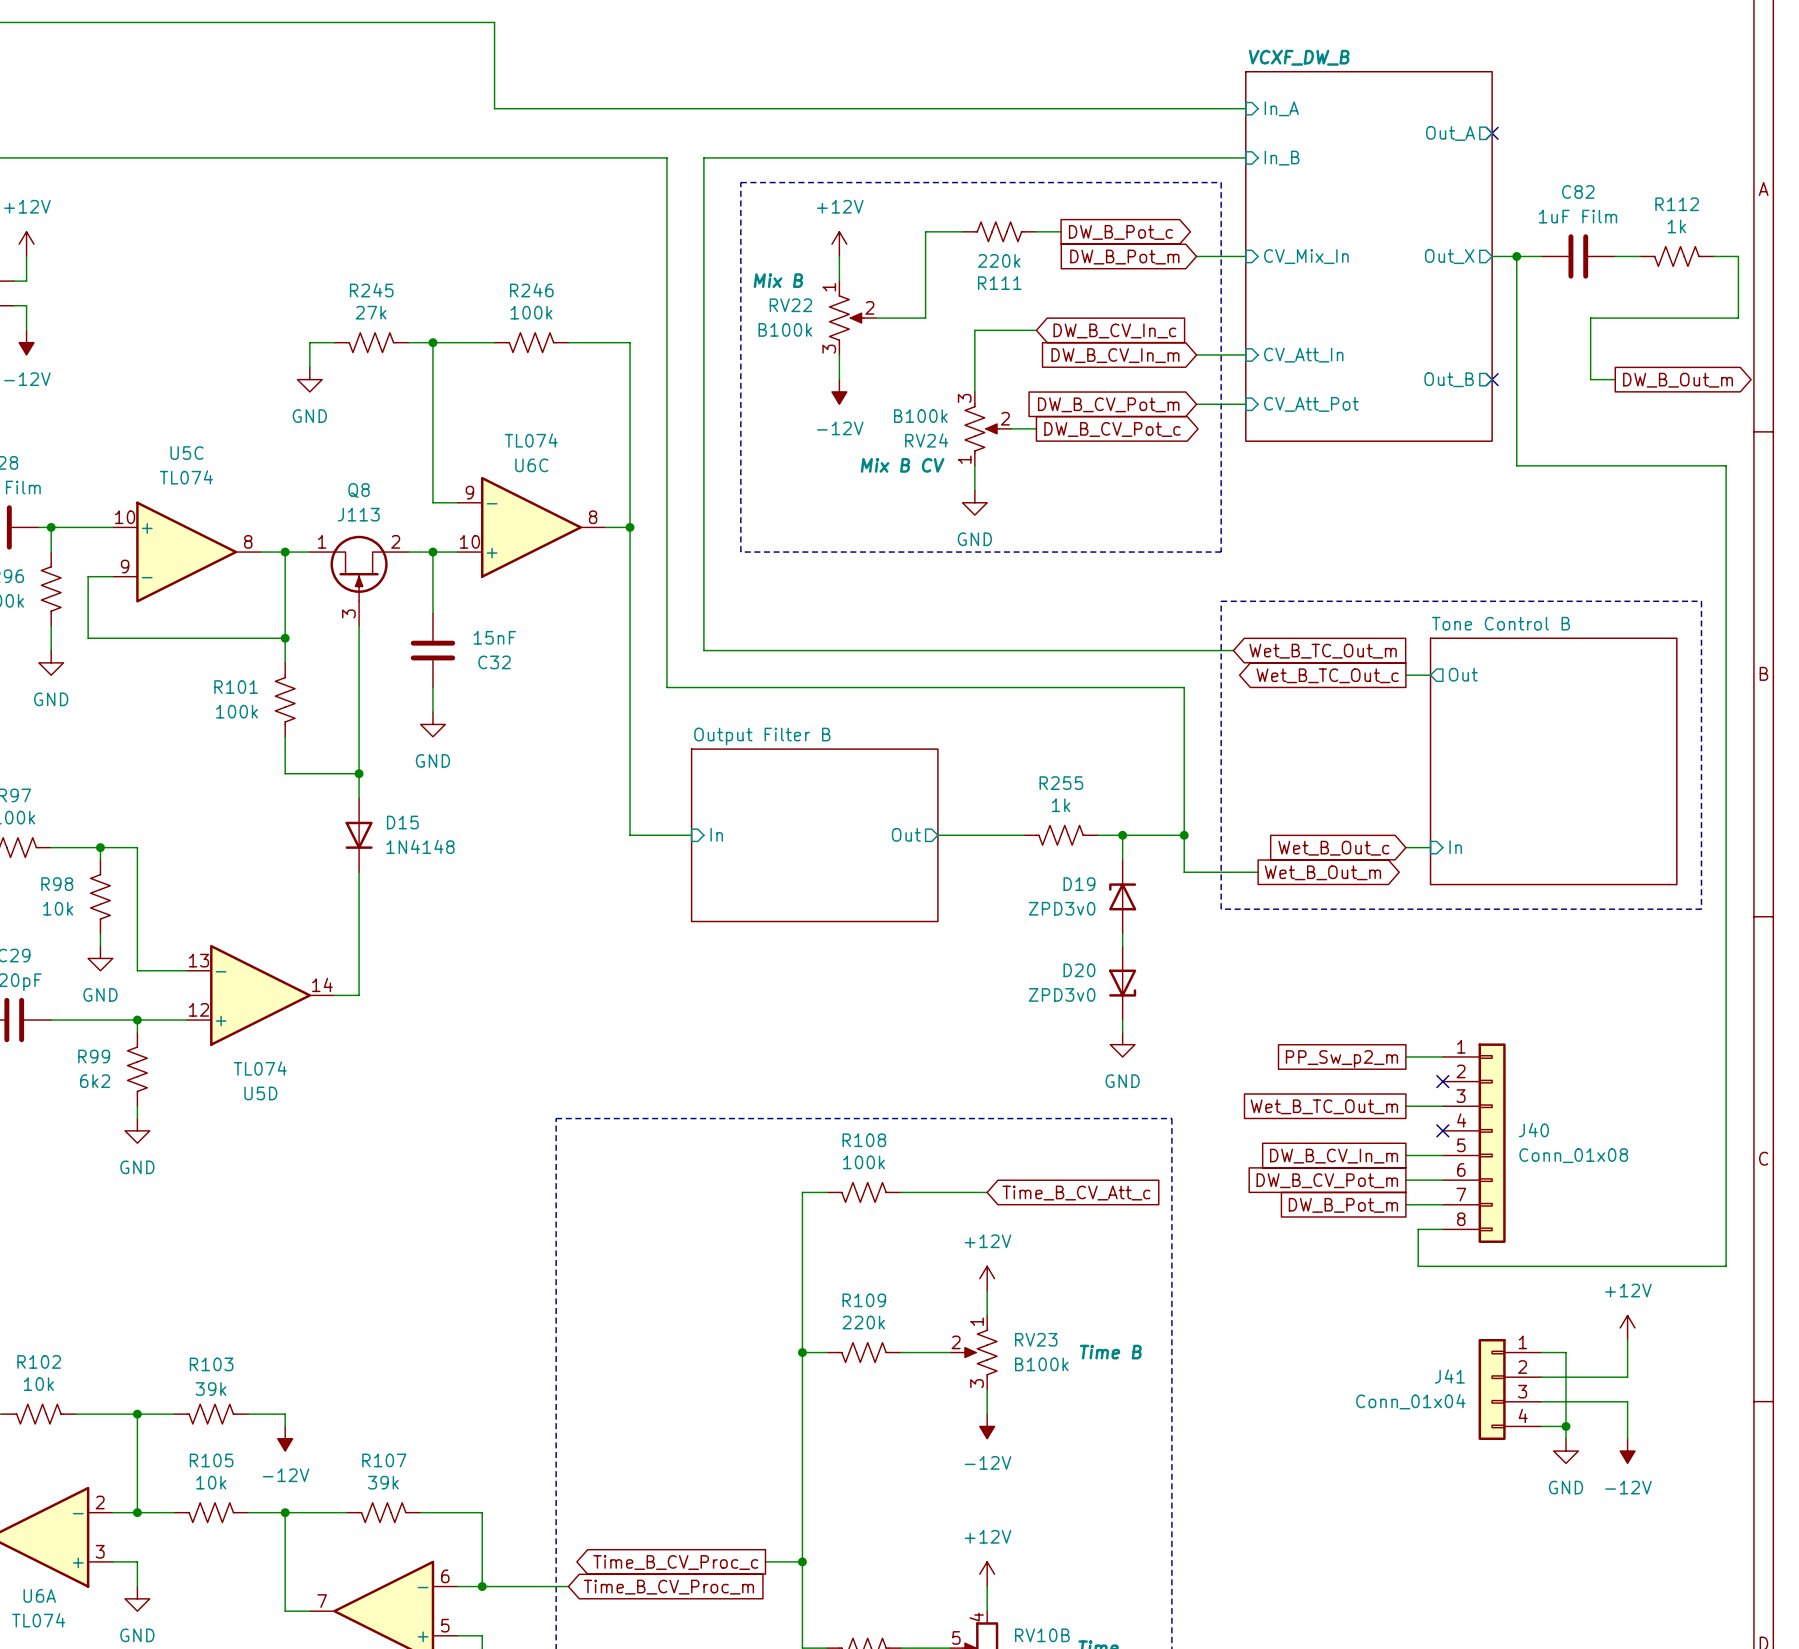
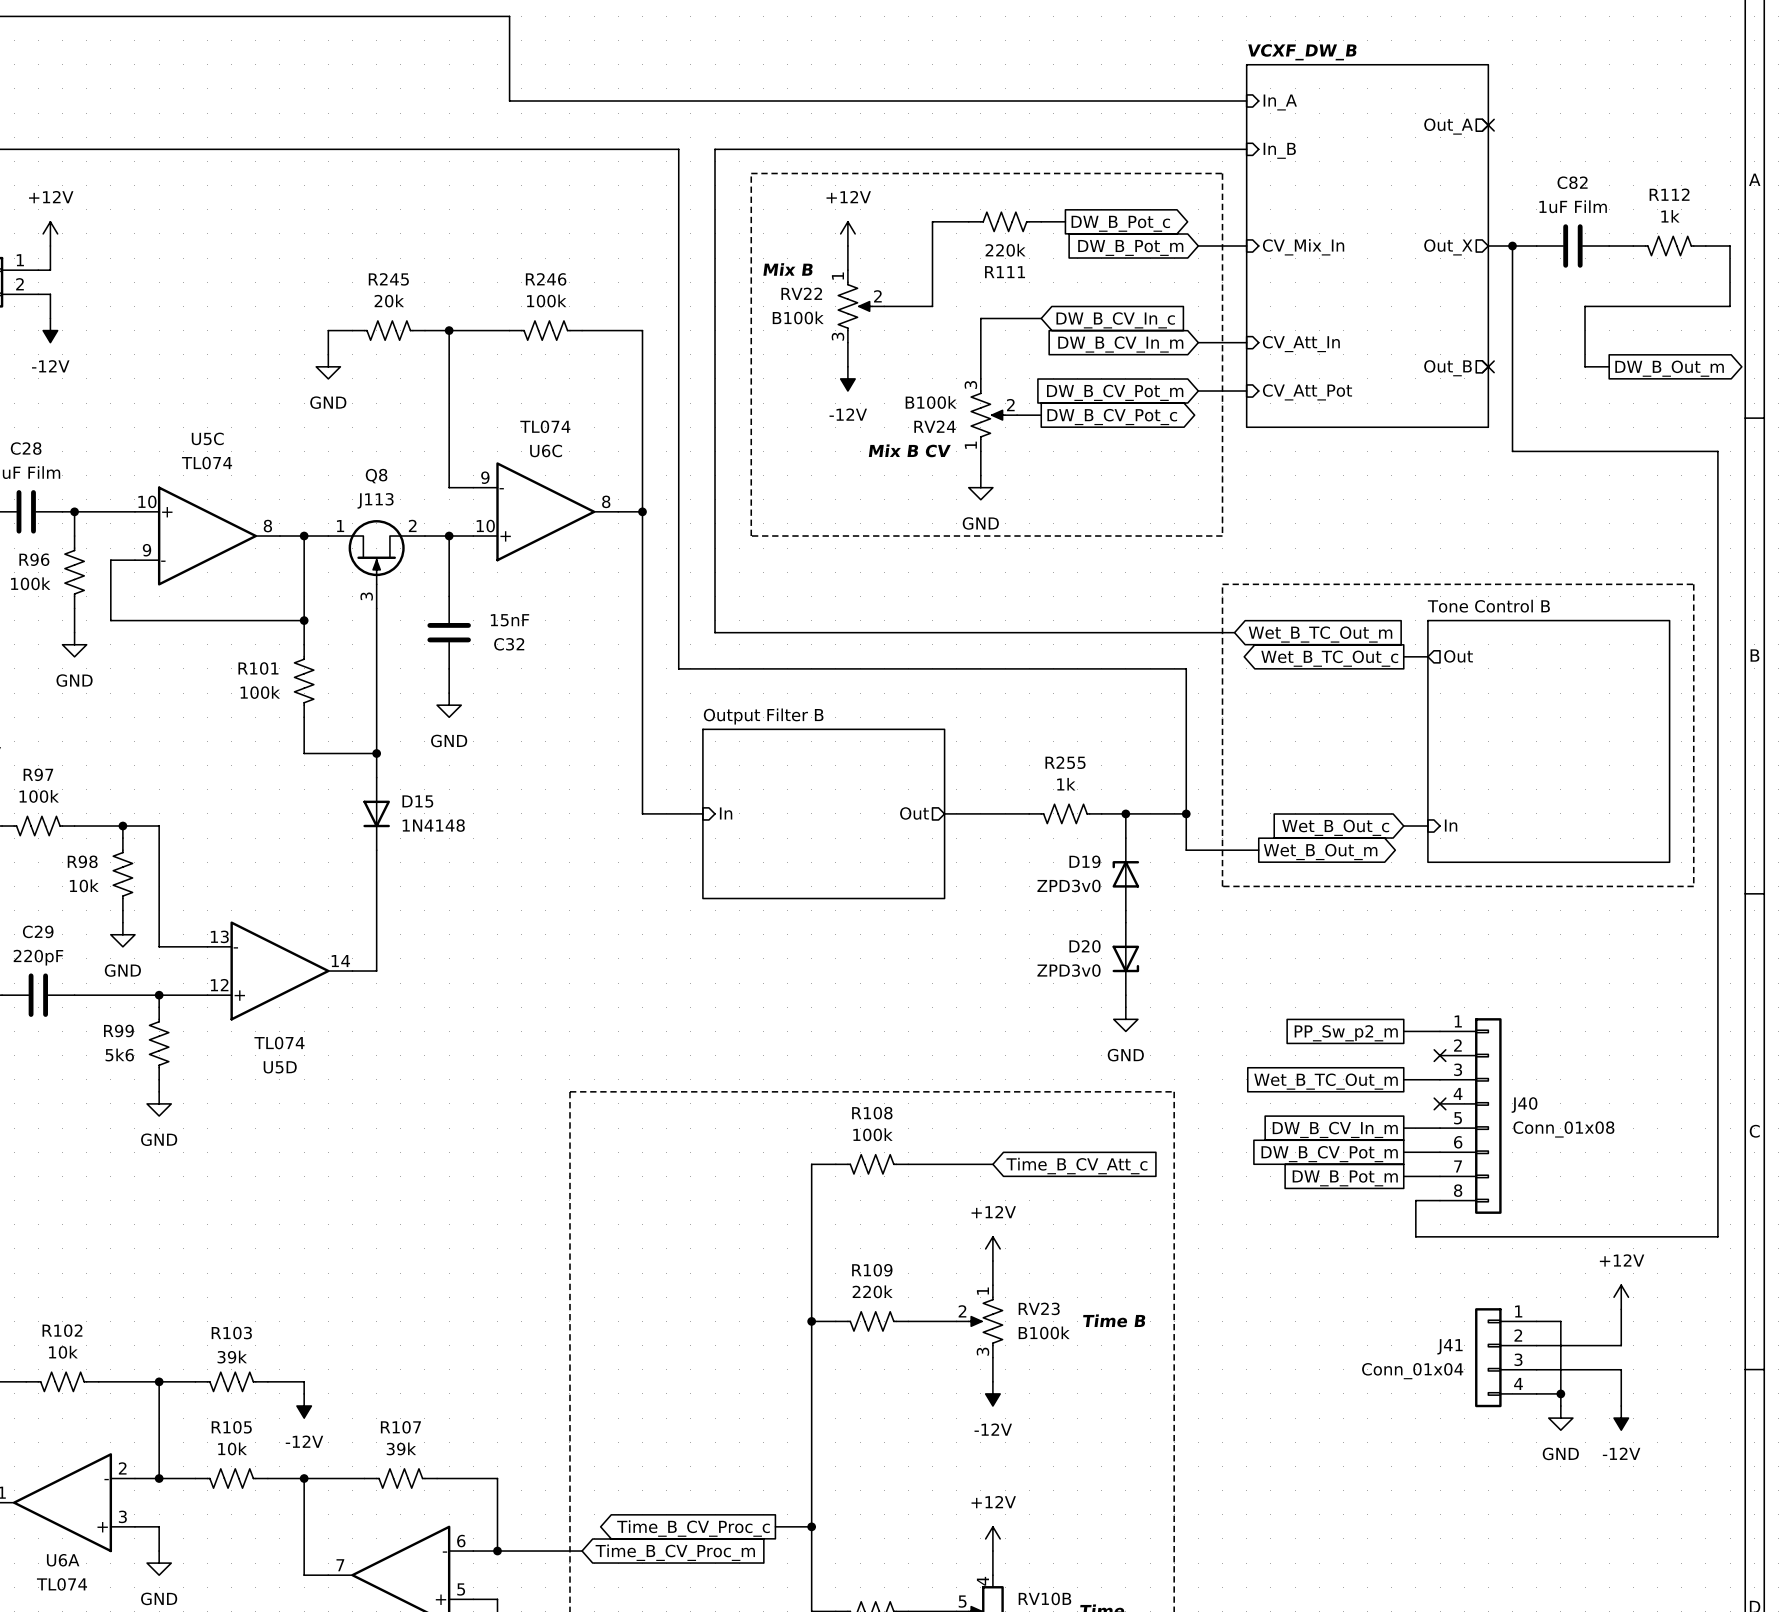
R245 value: 27k (371, 312) -> 20k (389, 300)
R99 value: 6k2 (95, 1081) -> 5k6 (119, 1055)

